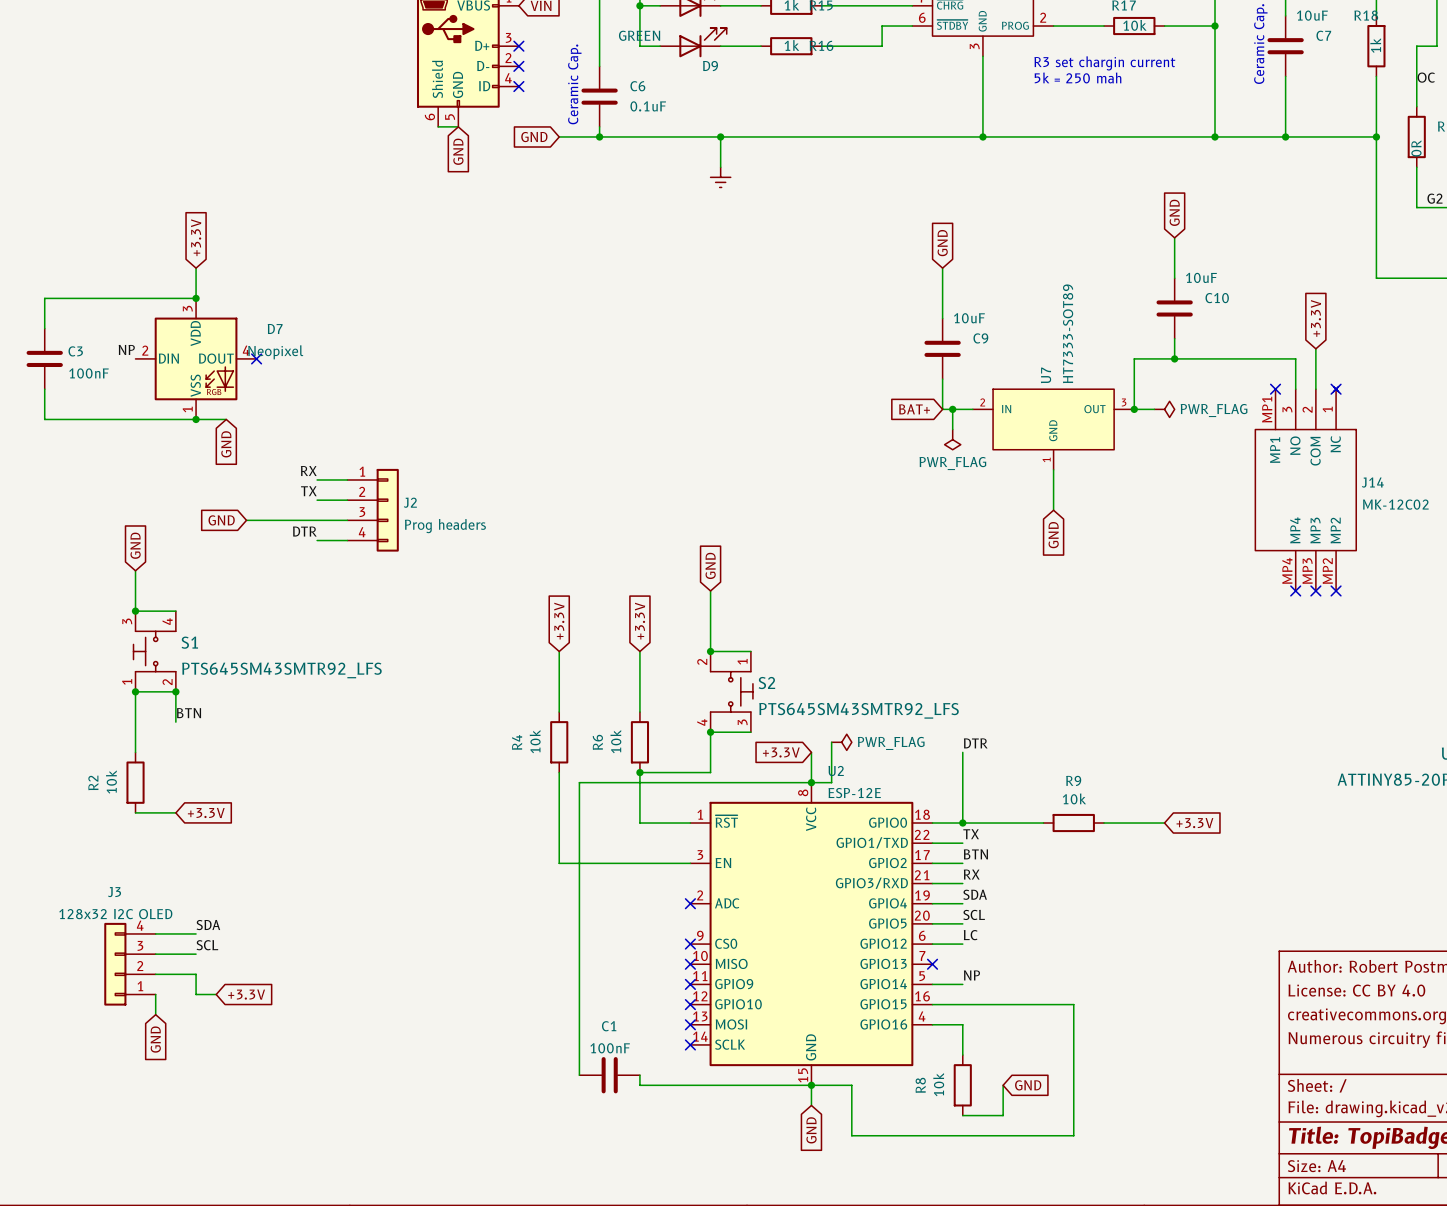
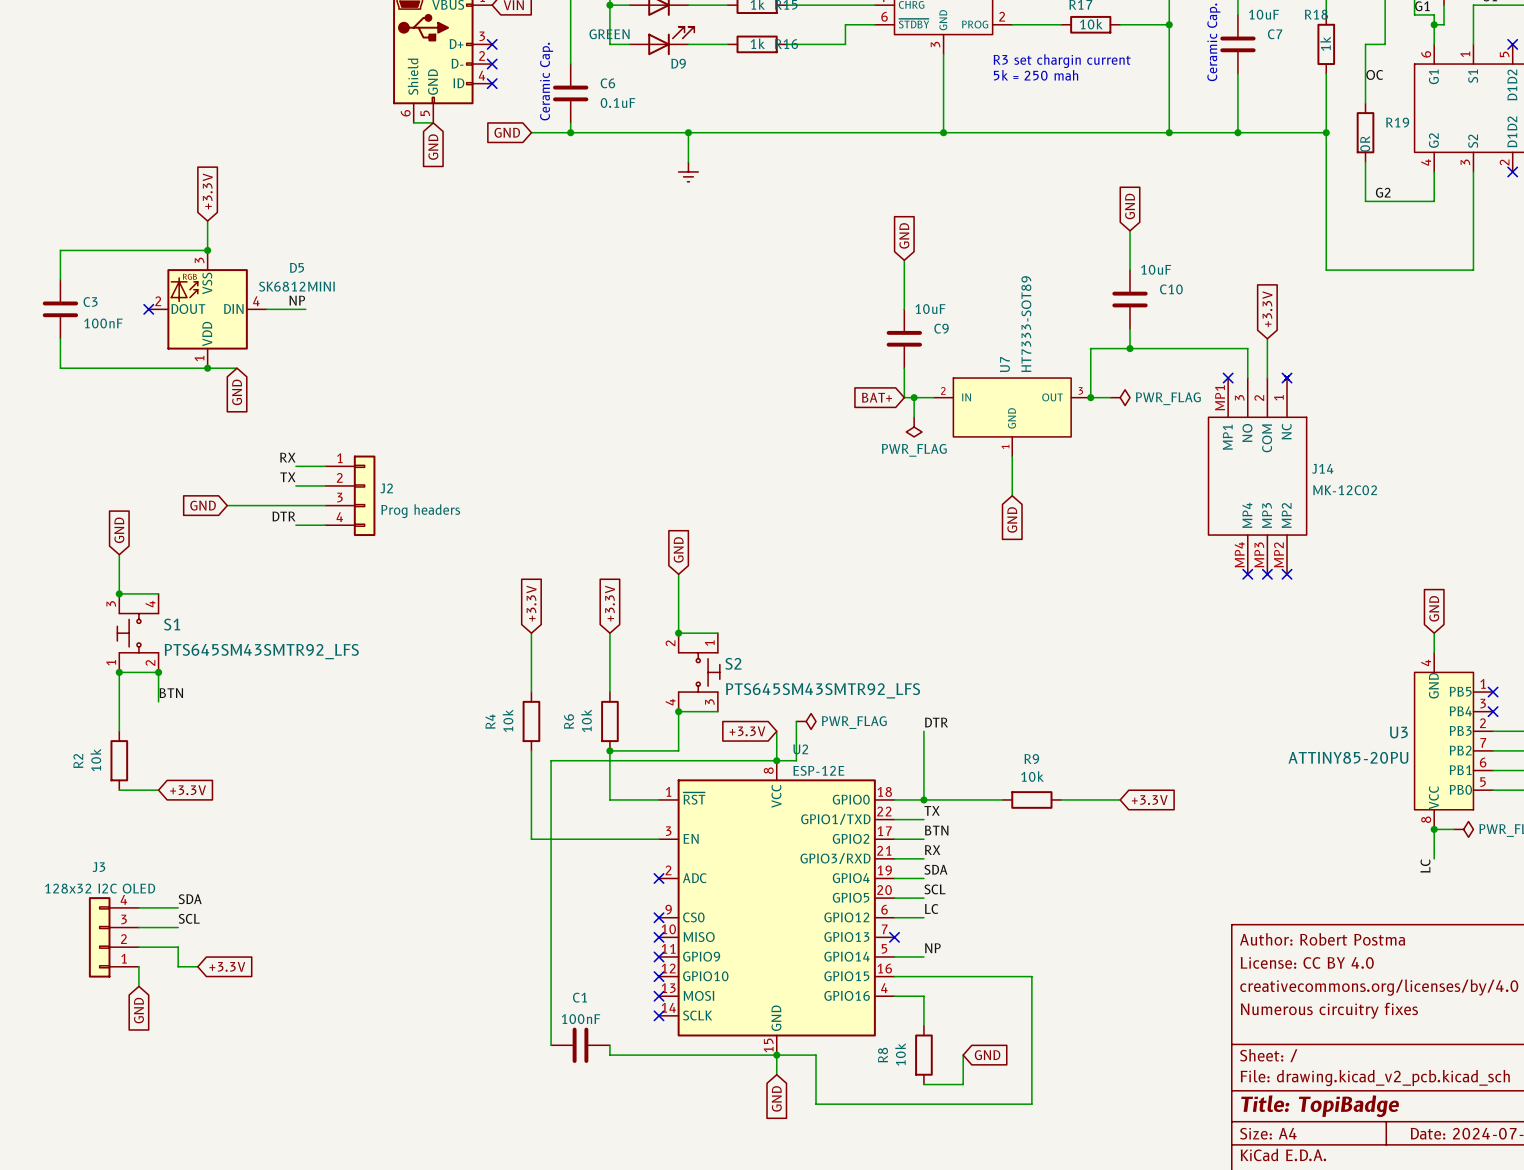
global label position: +3.3V (196, 237) -> +3.3V (207, 191)
junction: none -> (207, 250)
wire: (196, 268) (196, 298) (44, 298) (44, 328) -> (207, 221) (207, 250) (60, 250) (60, 279)
junction: (196, 298) -> none
no-connect mark: none -> (148, 309)
D5: none -> SK6812MINI (207, 309)
wire: none -> (266, 309) (305, 309)
label position: NP (126, 349) -> NP (297, 300)
C3 position: (44, 358) -> (60, 309)
D7: Neopixel (196, 358) -> none
no-connect mark: (256, 358) -> none
junction: none -> (207, 368)
wire: (44, 389) (44, 419) (226, 419) -> (60, 338) (60, 368) (237, 368)
junction: (196, 419) -> none
global label position: GND (226, 444) -> GND (237, 392)

